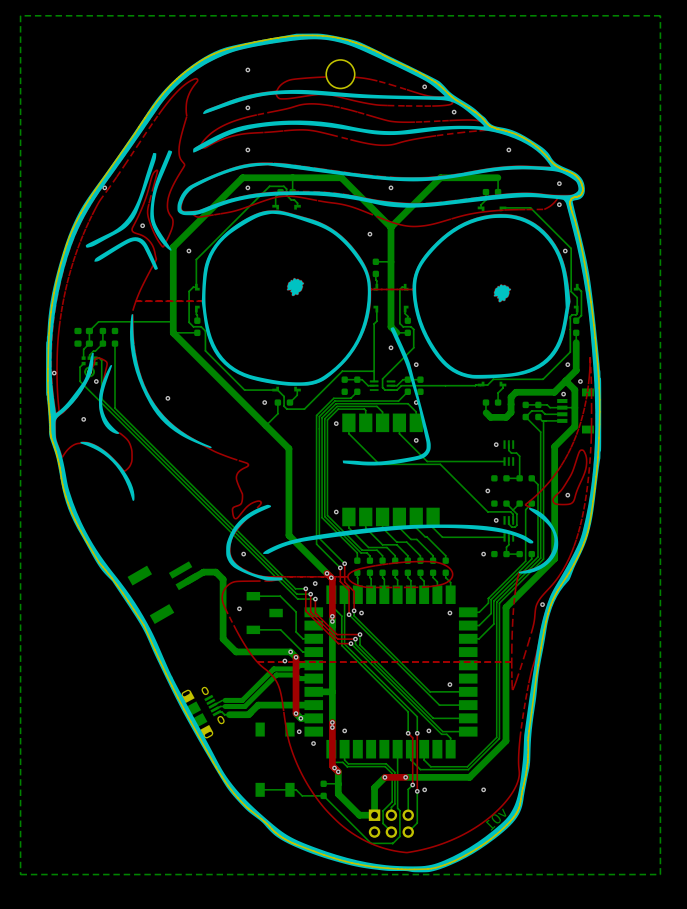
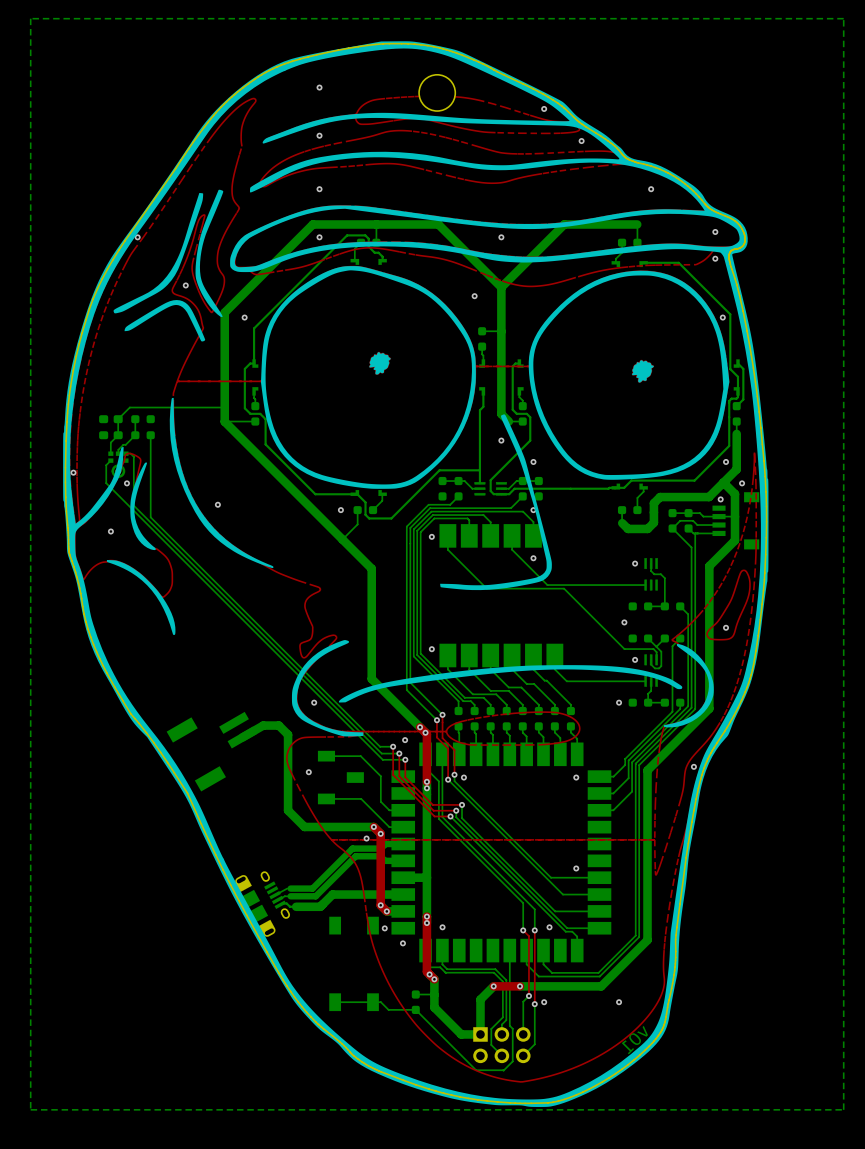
top track: none -> (373, 826) (380, 833)
top track: none -> (380, 905) (386, 911)

